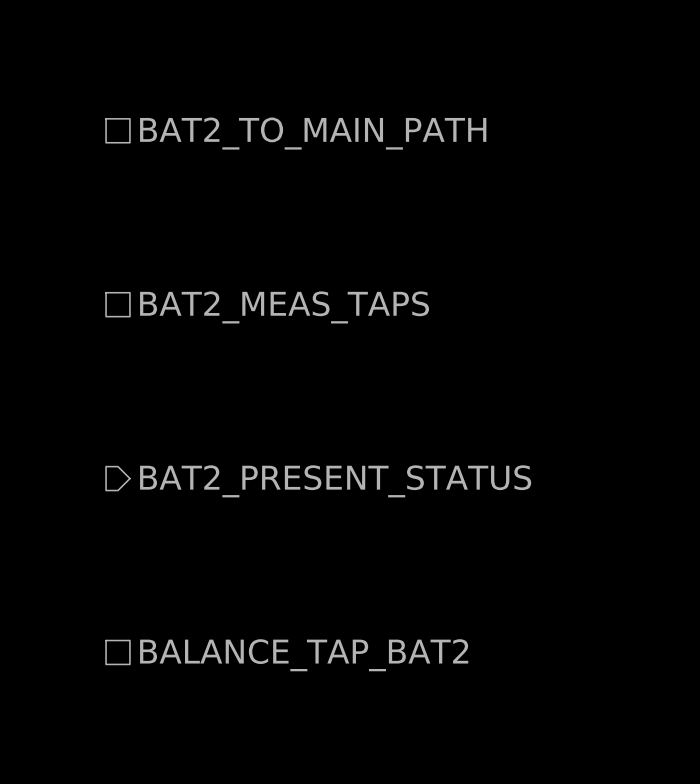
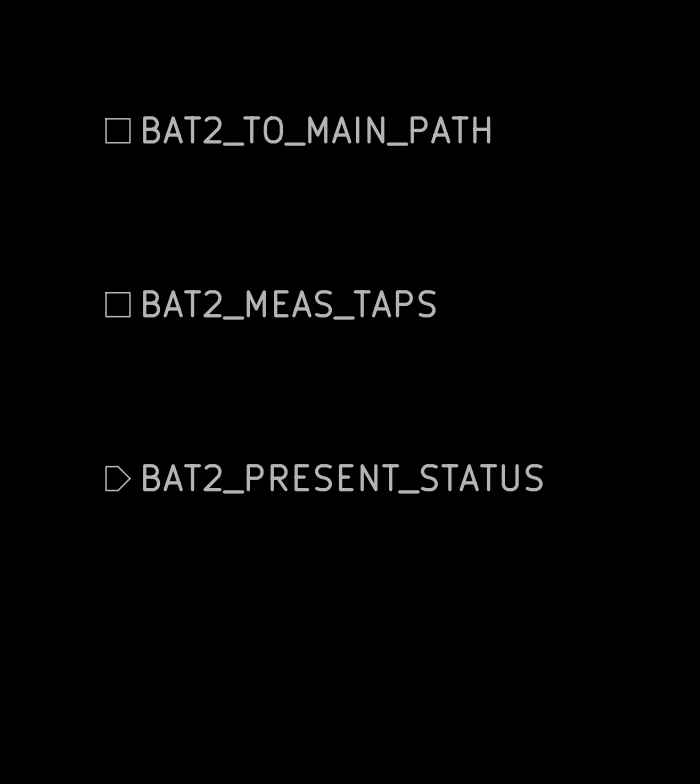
hierarchical label: BALANCE_TAP_BAT2 (304, 655) -> none

